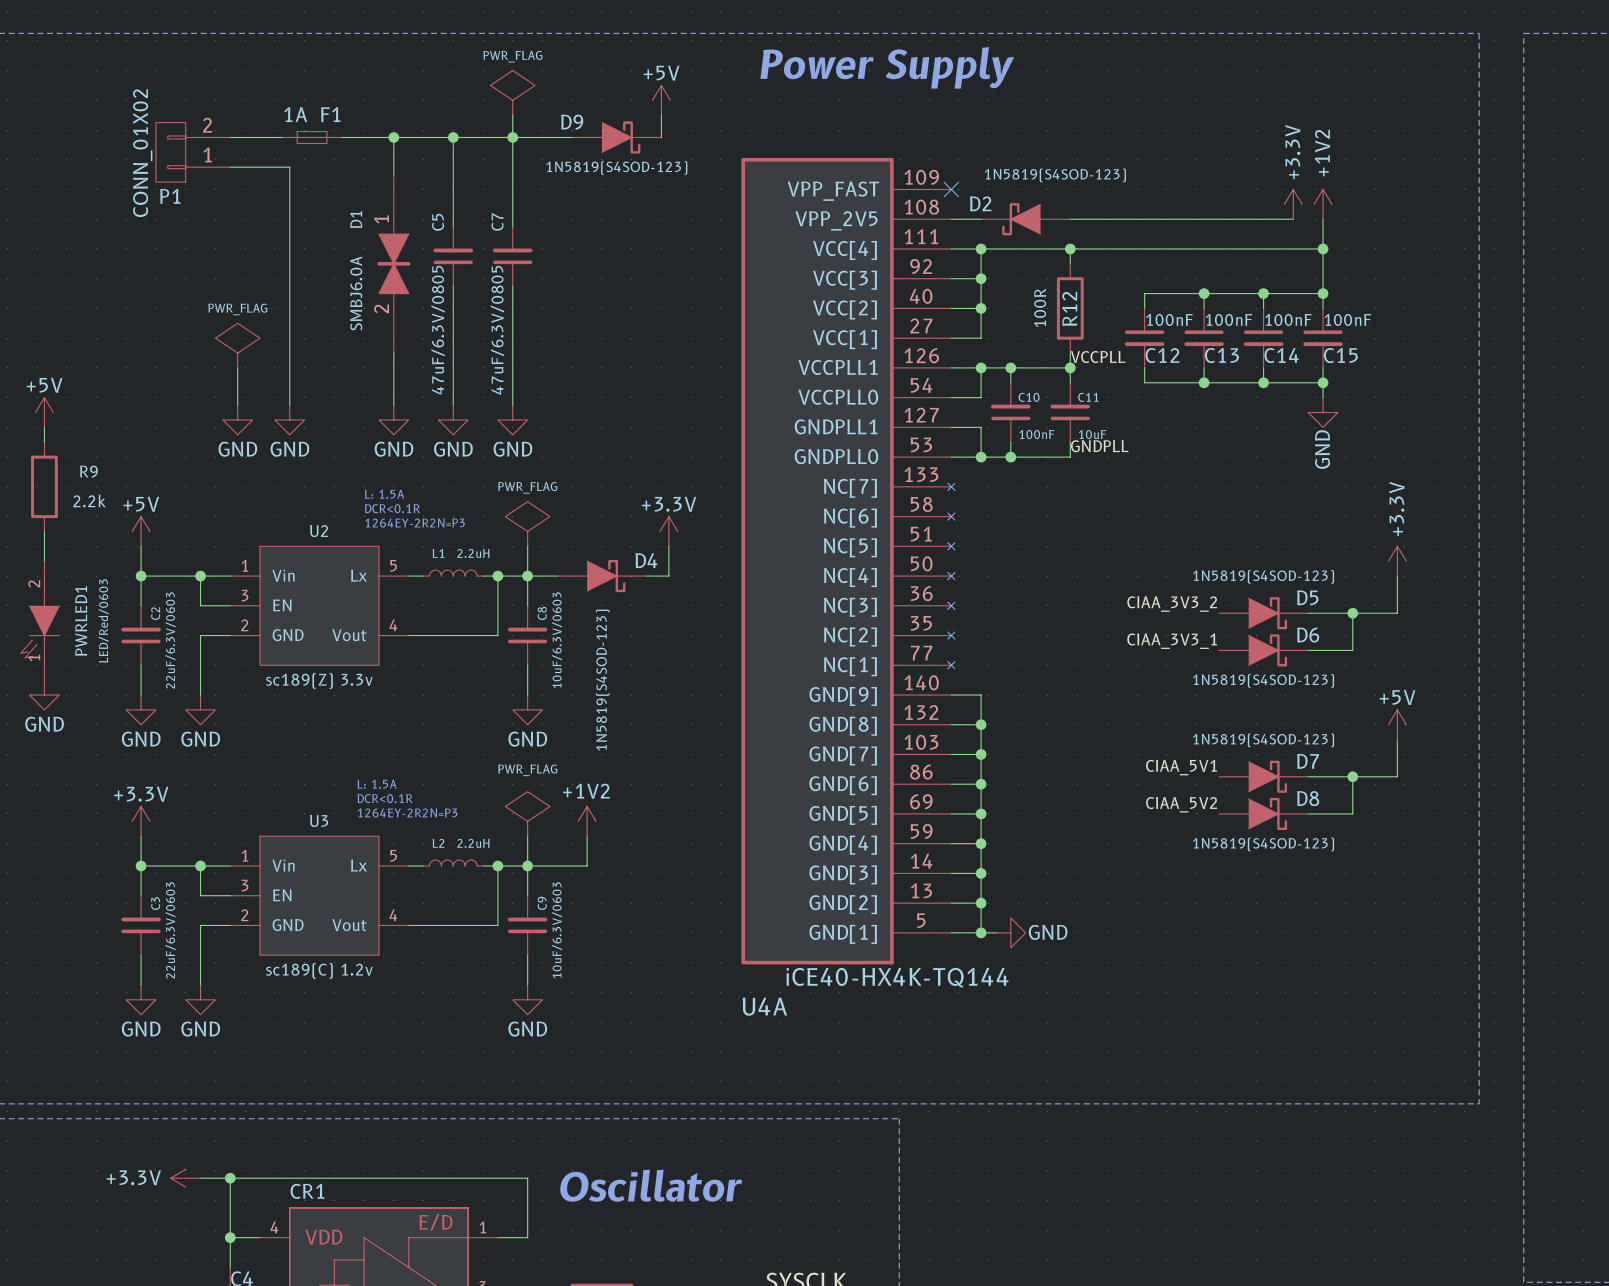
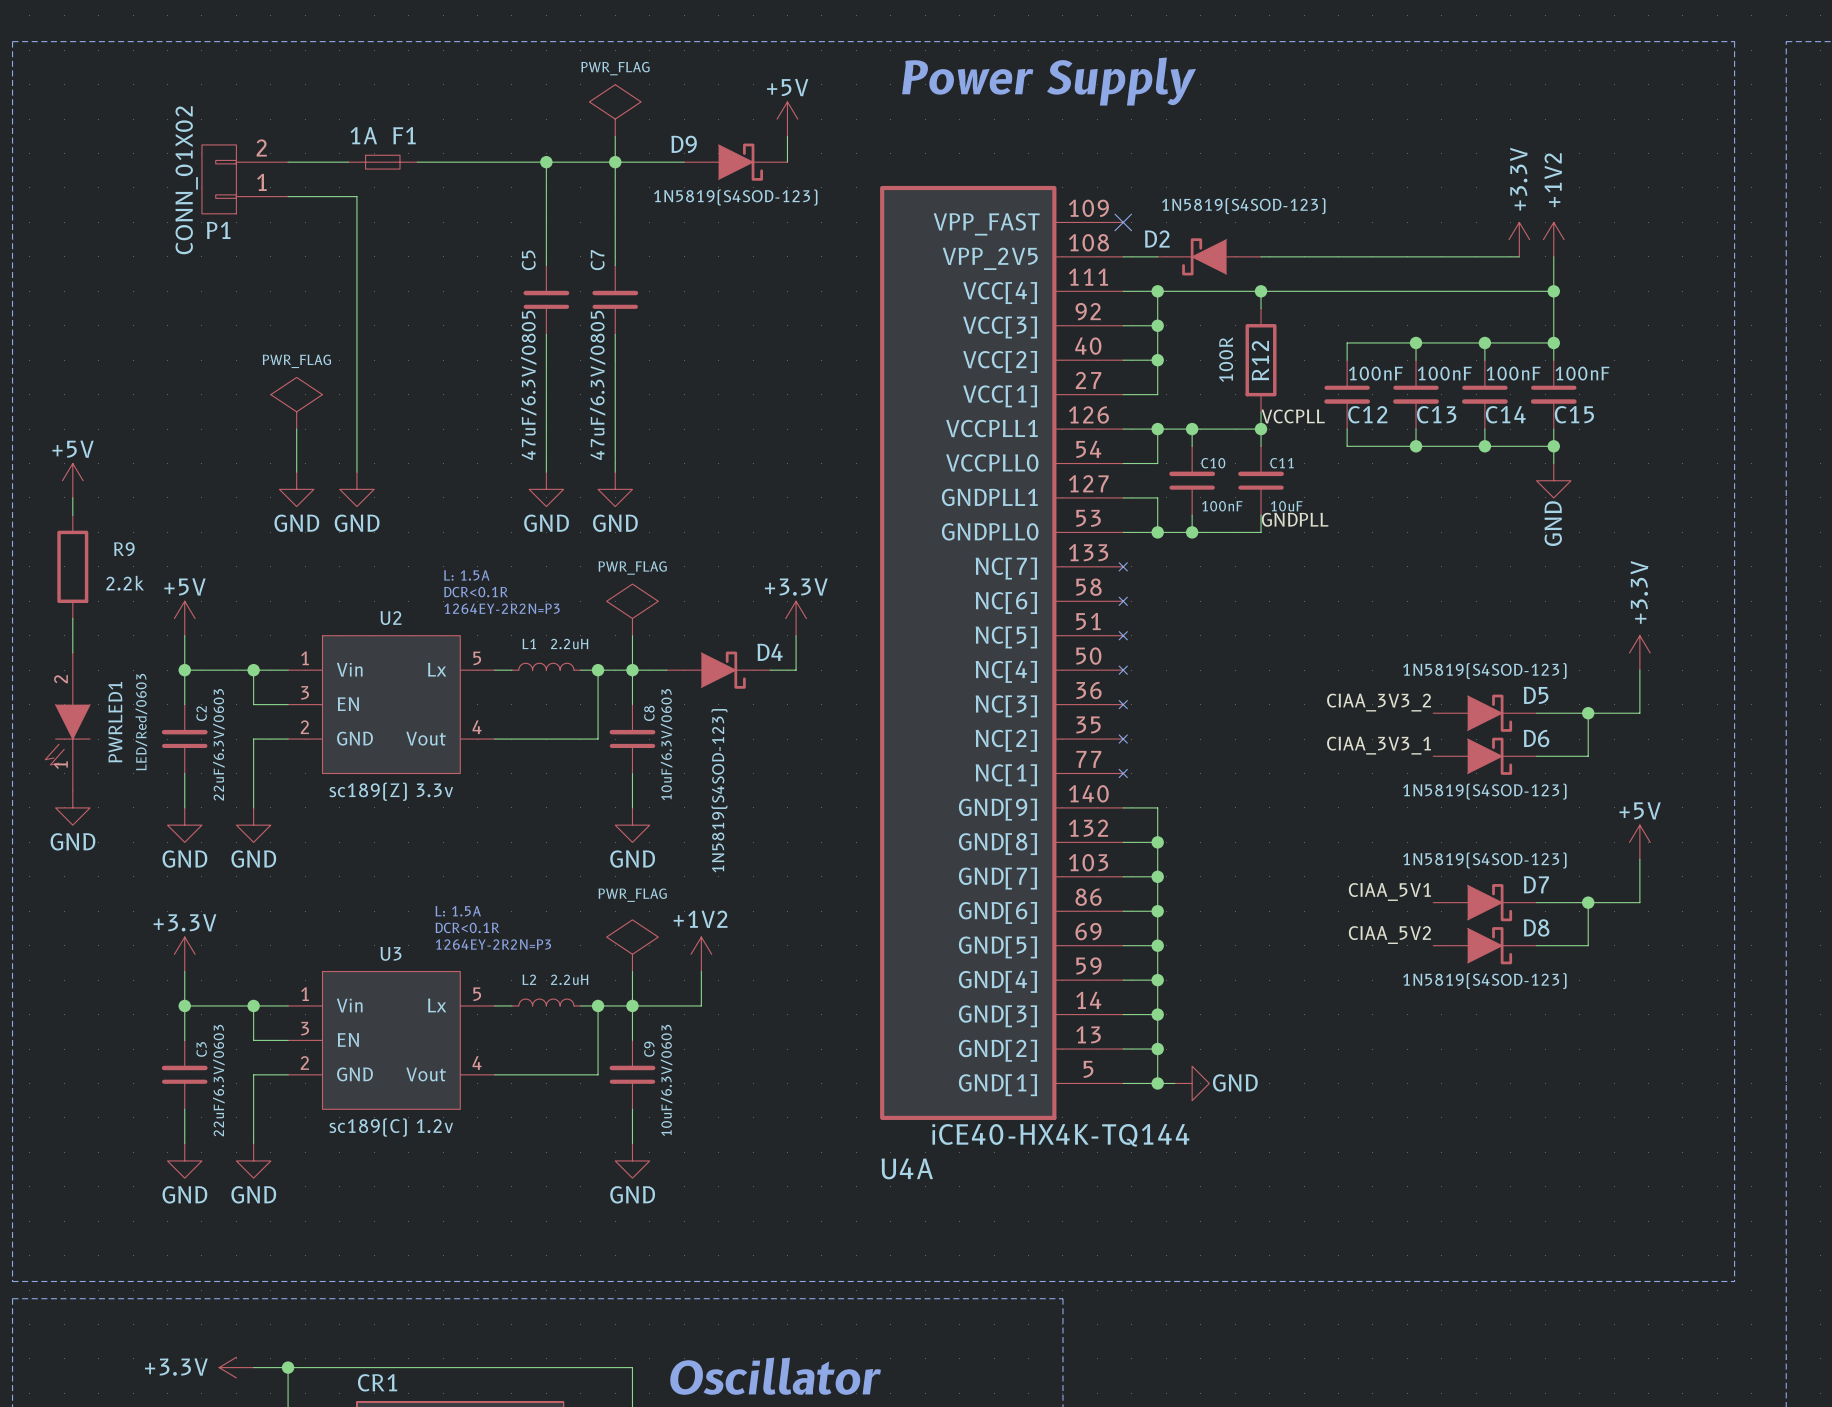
wire: (393, 137) (393, 174) -> none
junction: (393, 137) -> none
D1: SMBJ6.0A (393, 263) -> none
wire: (393, 353) (393, 405) -> none
power symbol: GND (393, 419) -> none

